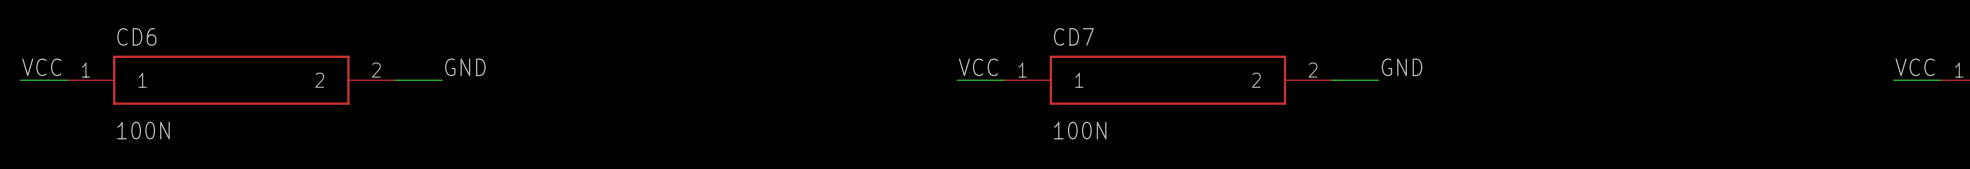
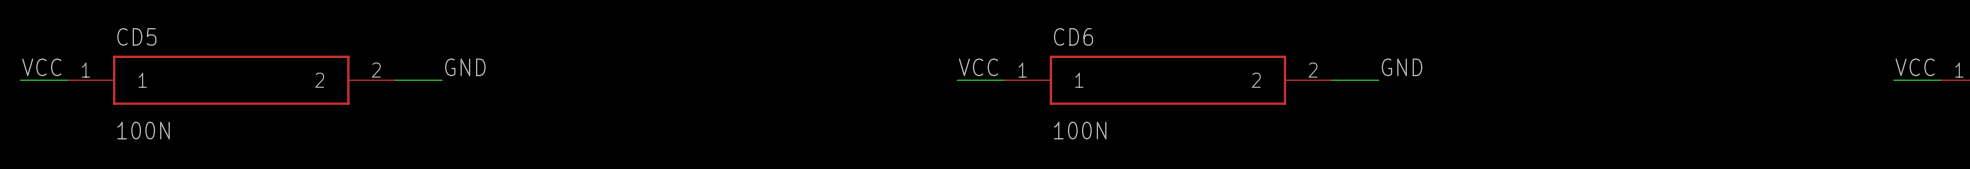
CD6 name: CD6 (136, 36) -> CD5 (136, 36)
CD7 name: CD7 (1073, 36) -> CD6 (1073, 36)

